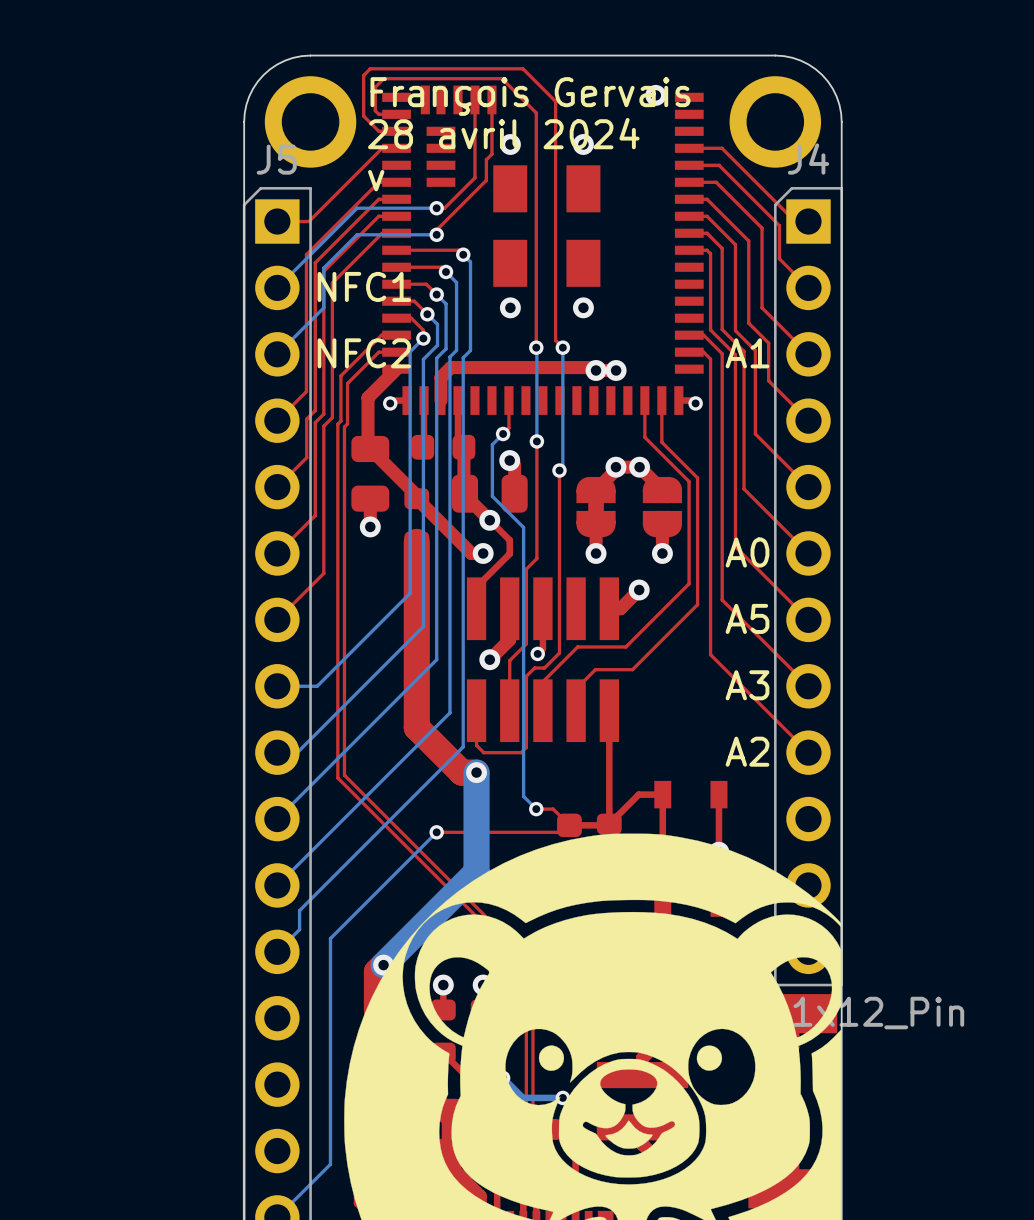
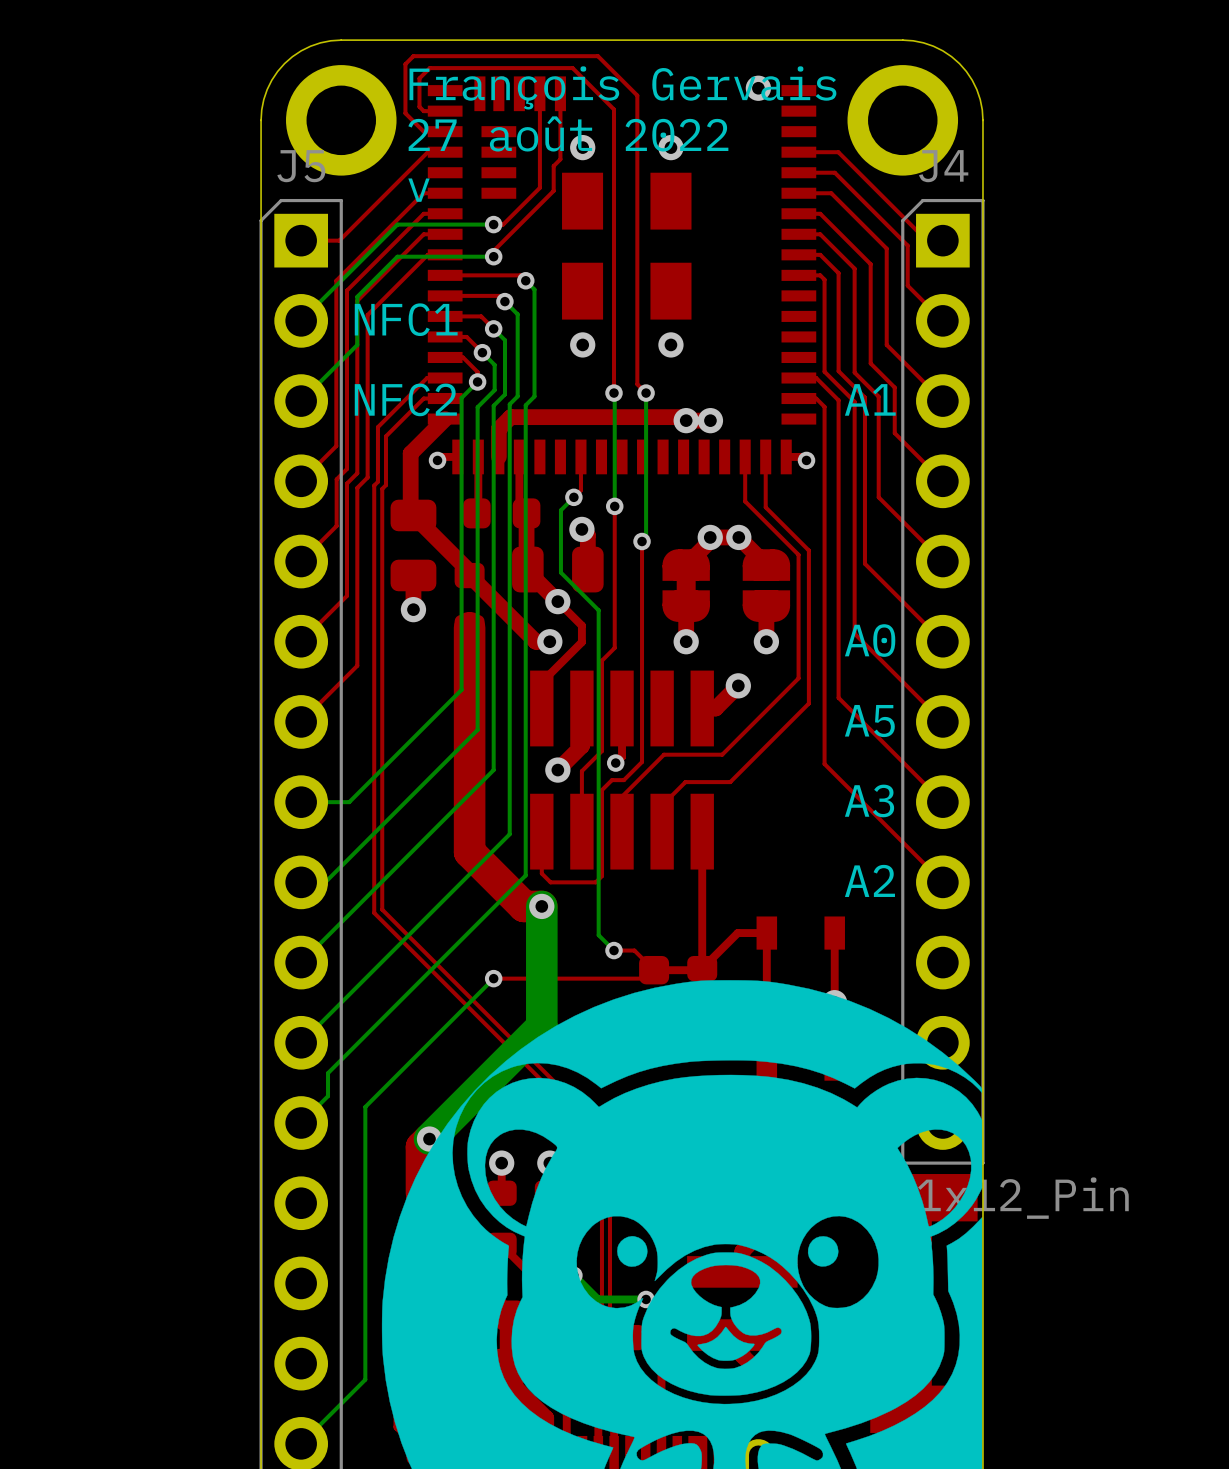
text: 28 avril 2024 (503, 133) -> 27 août 2022 (568, 133)

